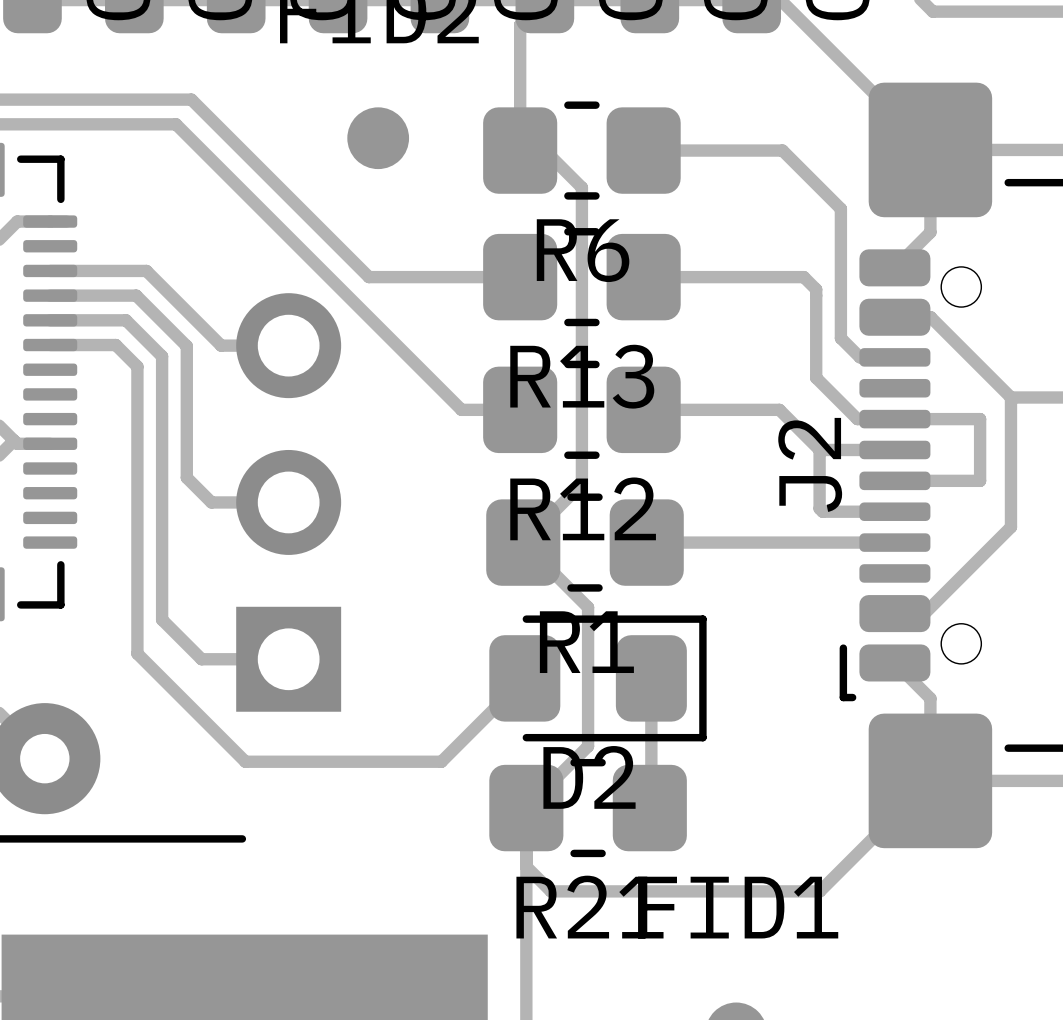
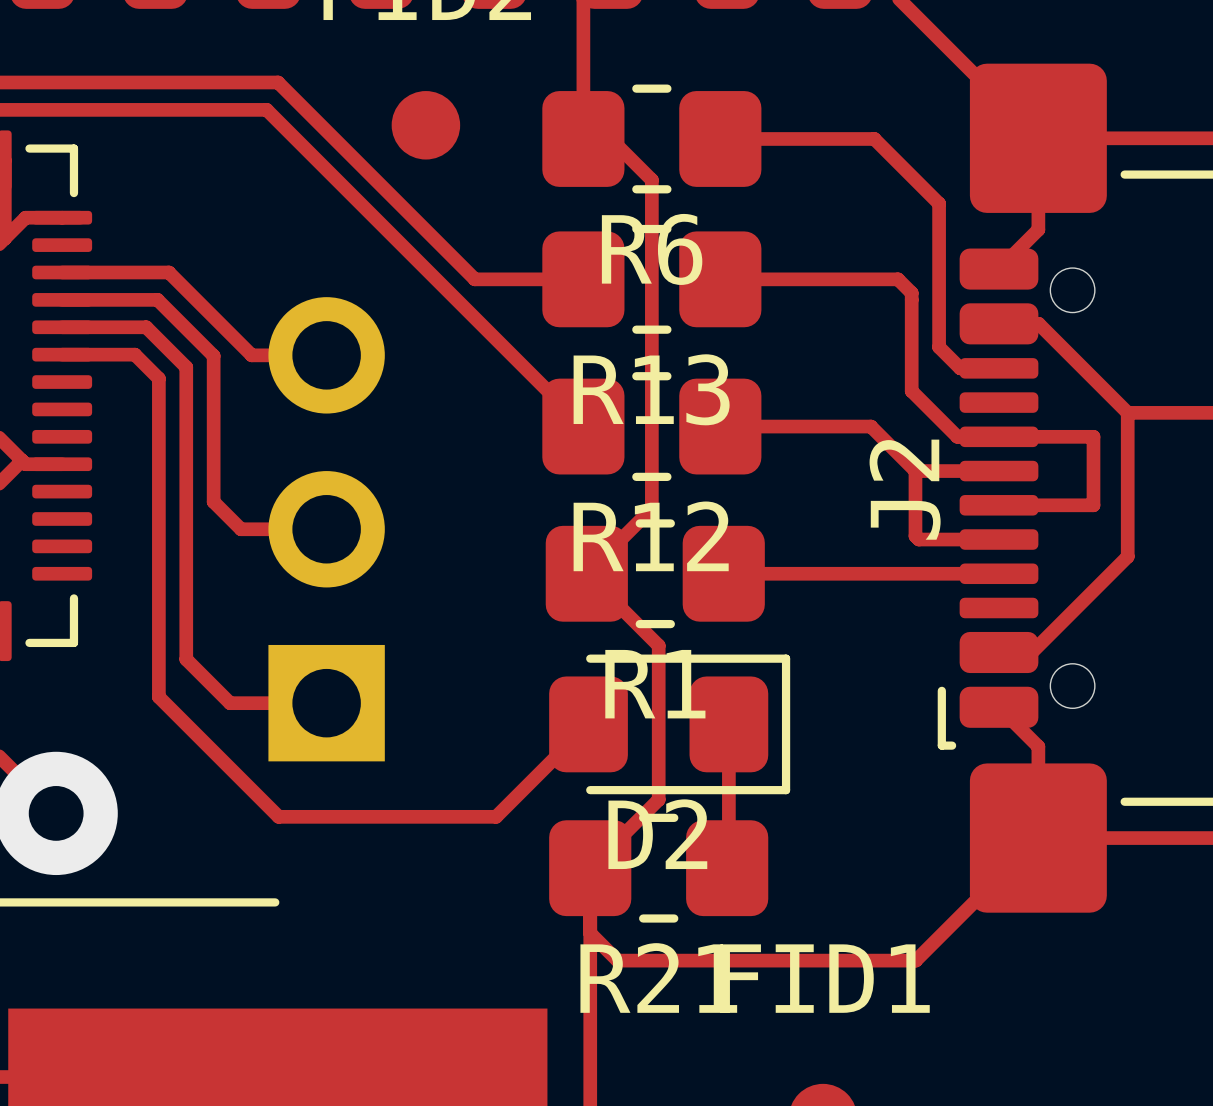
track: (191, 99) (368, 277) (422, 277) -> (218, 82) (278, 82) (474, 279)
track: (176, 124) (461, 409) (520, 409) -> (201, 109) (266, 109) (583, 426)

